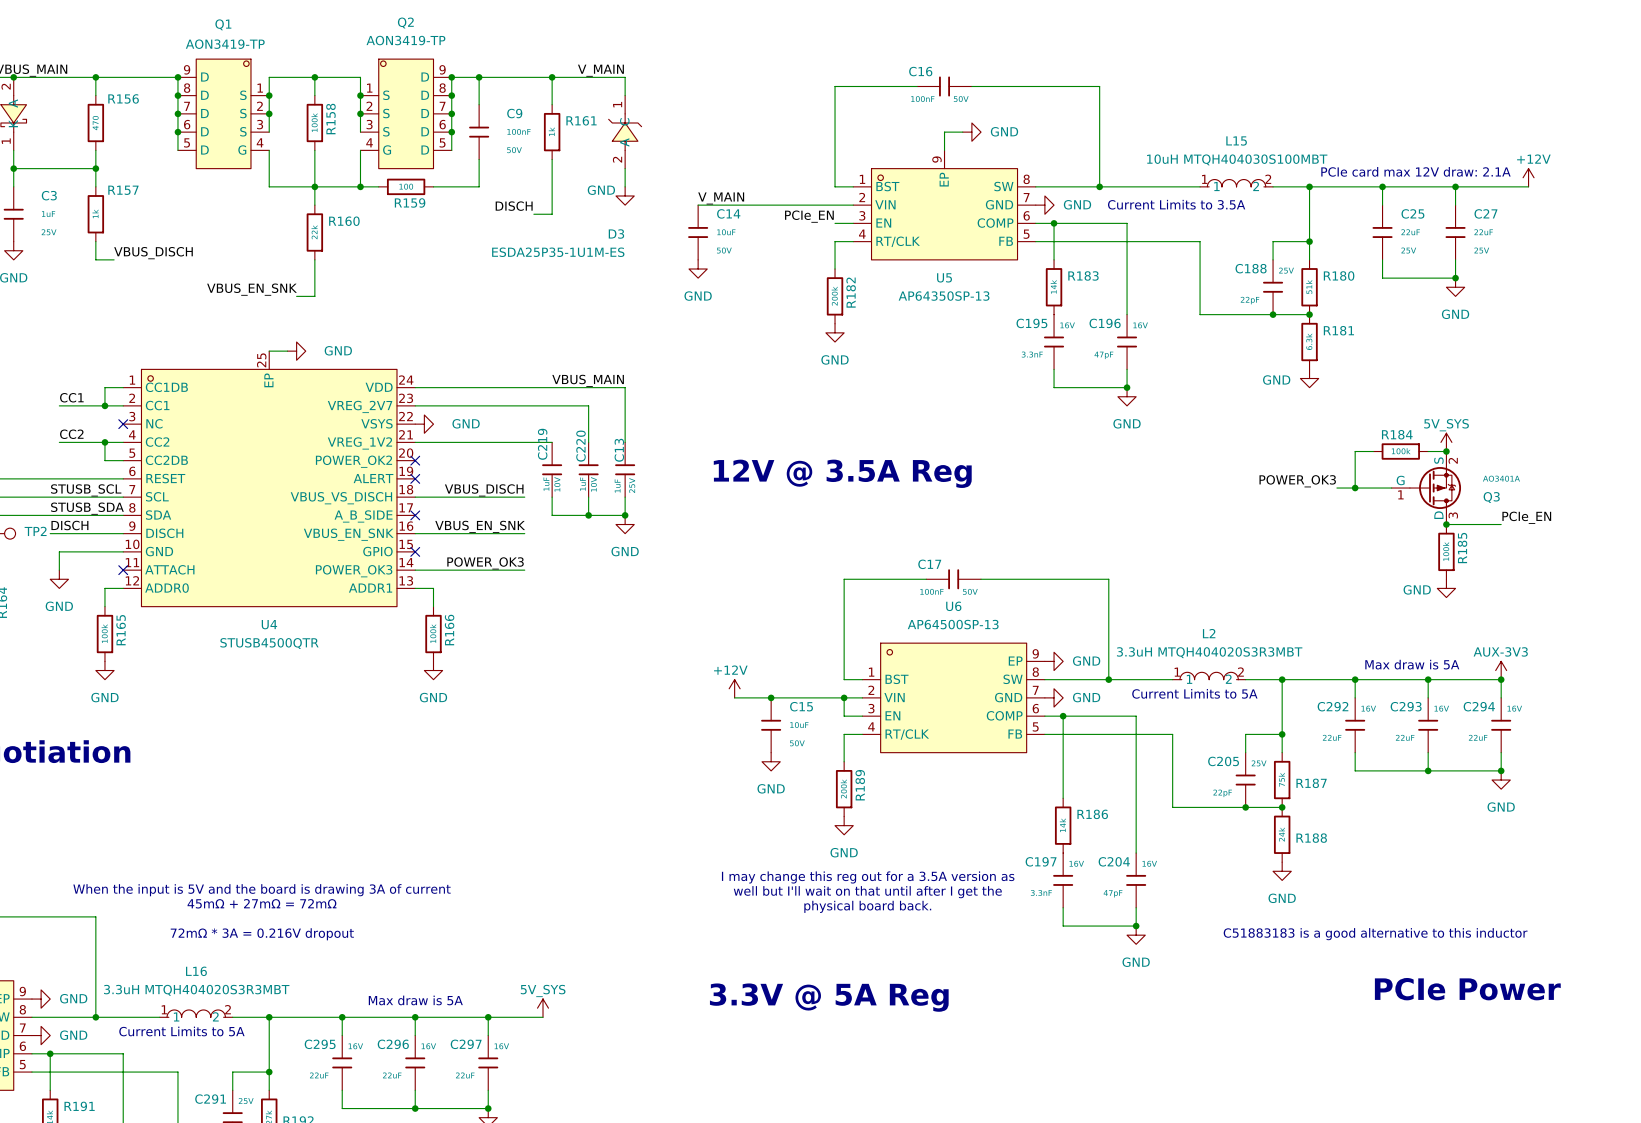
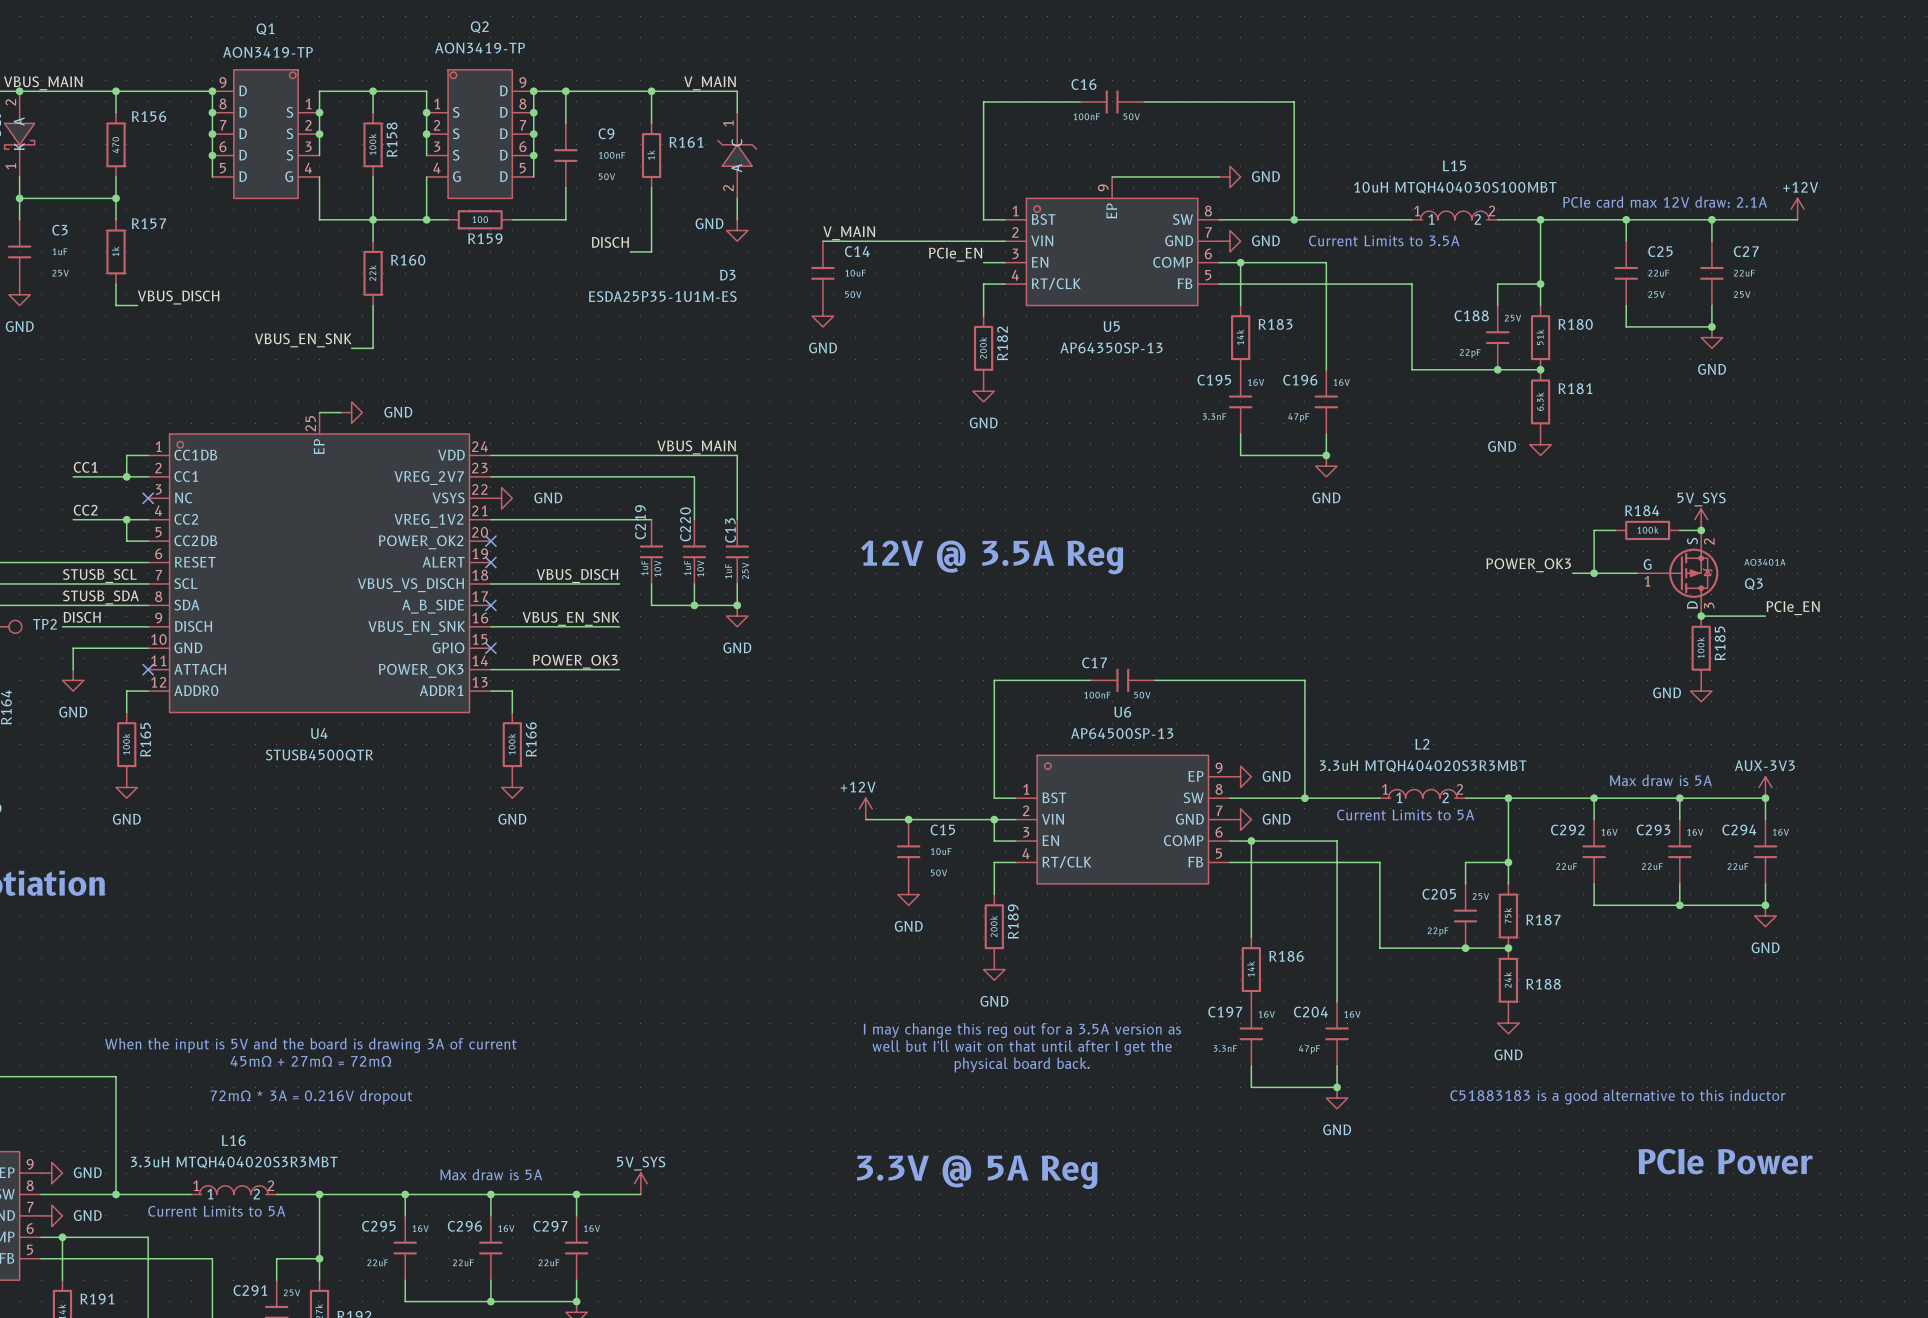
wire: (962, 132) (944, 132) (944, 150) -> (1219, 176) (1112, 176)
power symbol position: GND (971, 132) -> GND (1229, 176)

